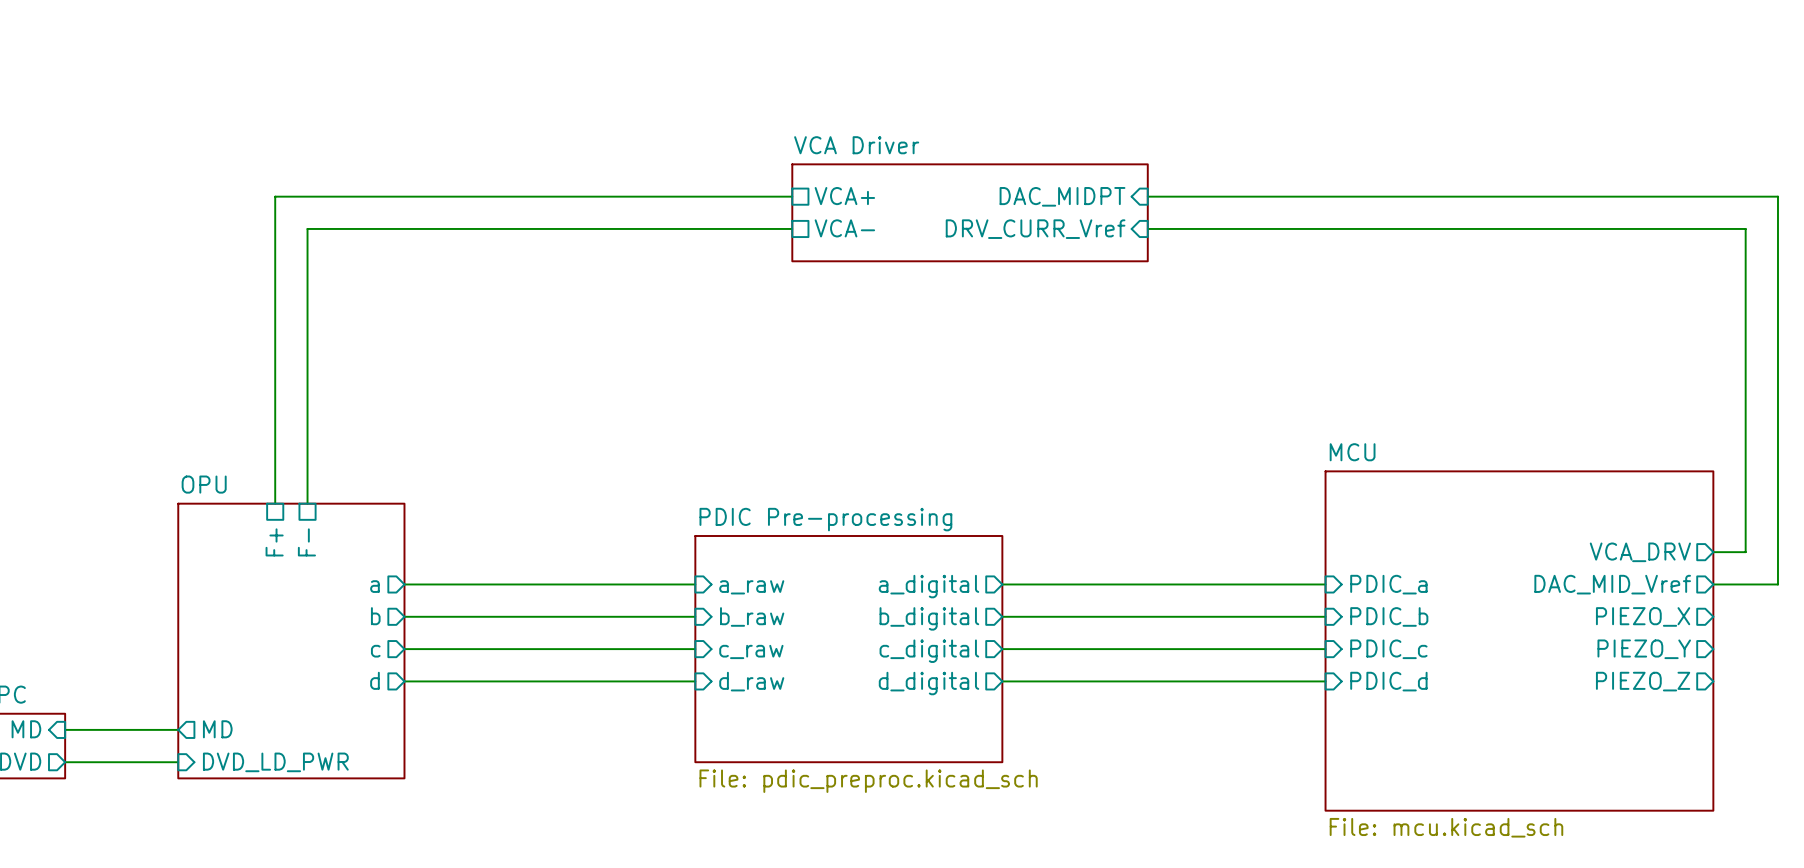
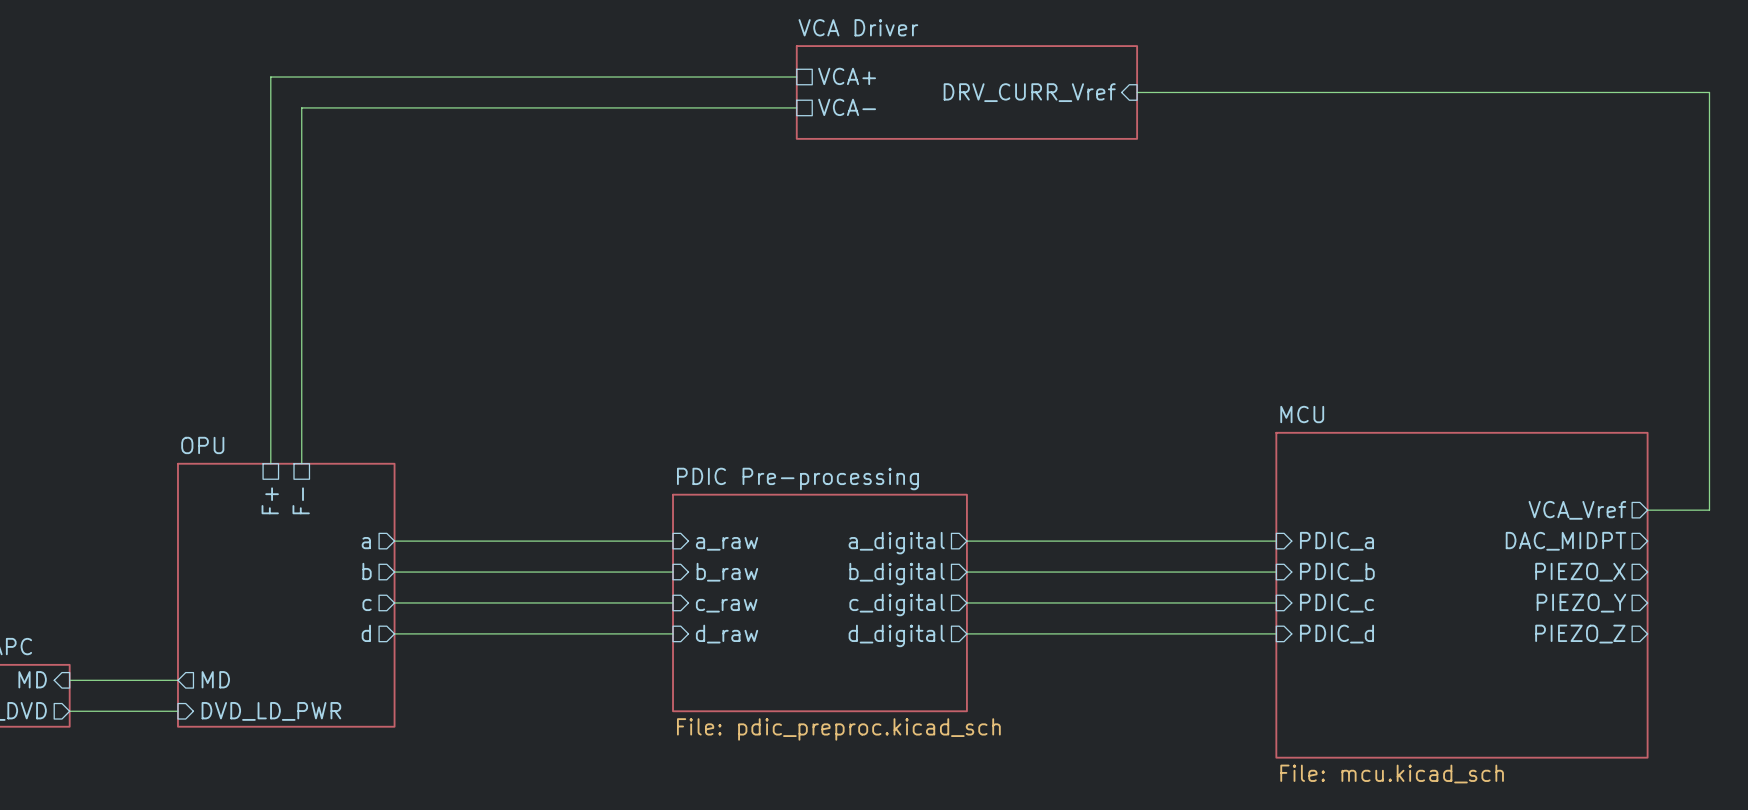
wire: (275, 196) (792, 196) -> (270, 169) (270, 77) (796, 77)
sheet pin position: VCA+ (844, 196) -> VCA+ (847, 76)
sheet pin: DAC_MIDPT (1062, 196) -> none
wire: (1147, 196) (1777, 196) -> (1137, 92) (1709, 92) (1709, 169)
sheet VCA Driver position: (970, 212) -> (966, 92)
wire: (307, 228) (792, 228) -> (301, 200) (301, 107) (796, 107)
sheet pin position: VCA- (844, 228) -> VCA- (847, 107)
wire: (1147, 228) (1745, 228) (1745, 552) -> none
sheet pin position: DRV_CURR_Vref (1035, 229) -> DRV_CURR_Vref (1029, 92)
sheet pin: VCA_DRV (1640, 552) -> VCA_Vref (1577, 510)
wire: (1777, 552) (1777, 584) (1713, 584) -> (1709, 510) (1678, 510)
sheet pin: DAC_MID_Vref (1612, 584) -> DAC_MIDPT (1565, 541)

